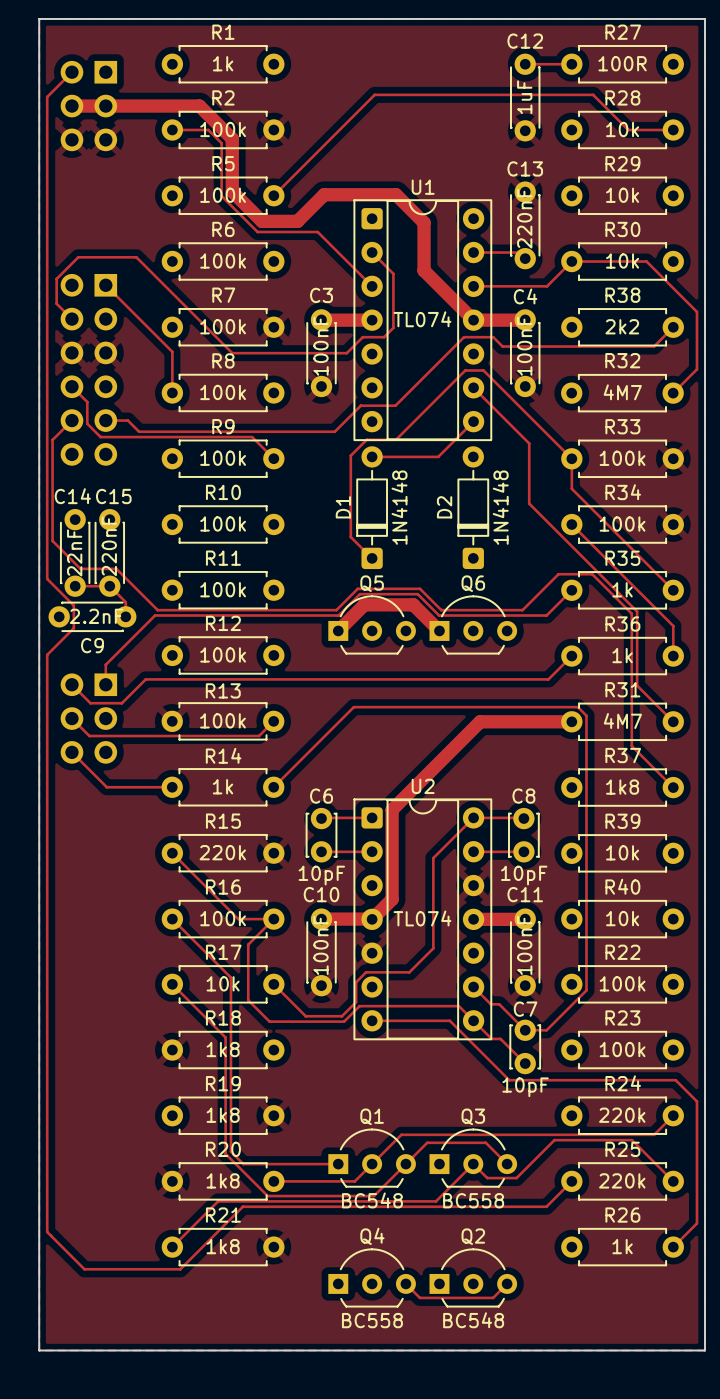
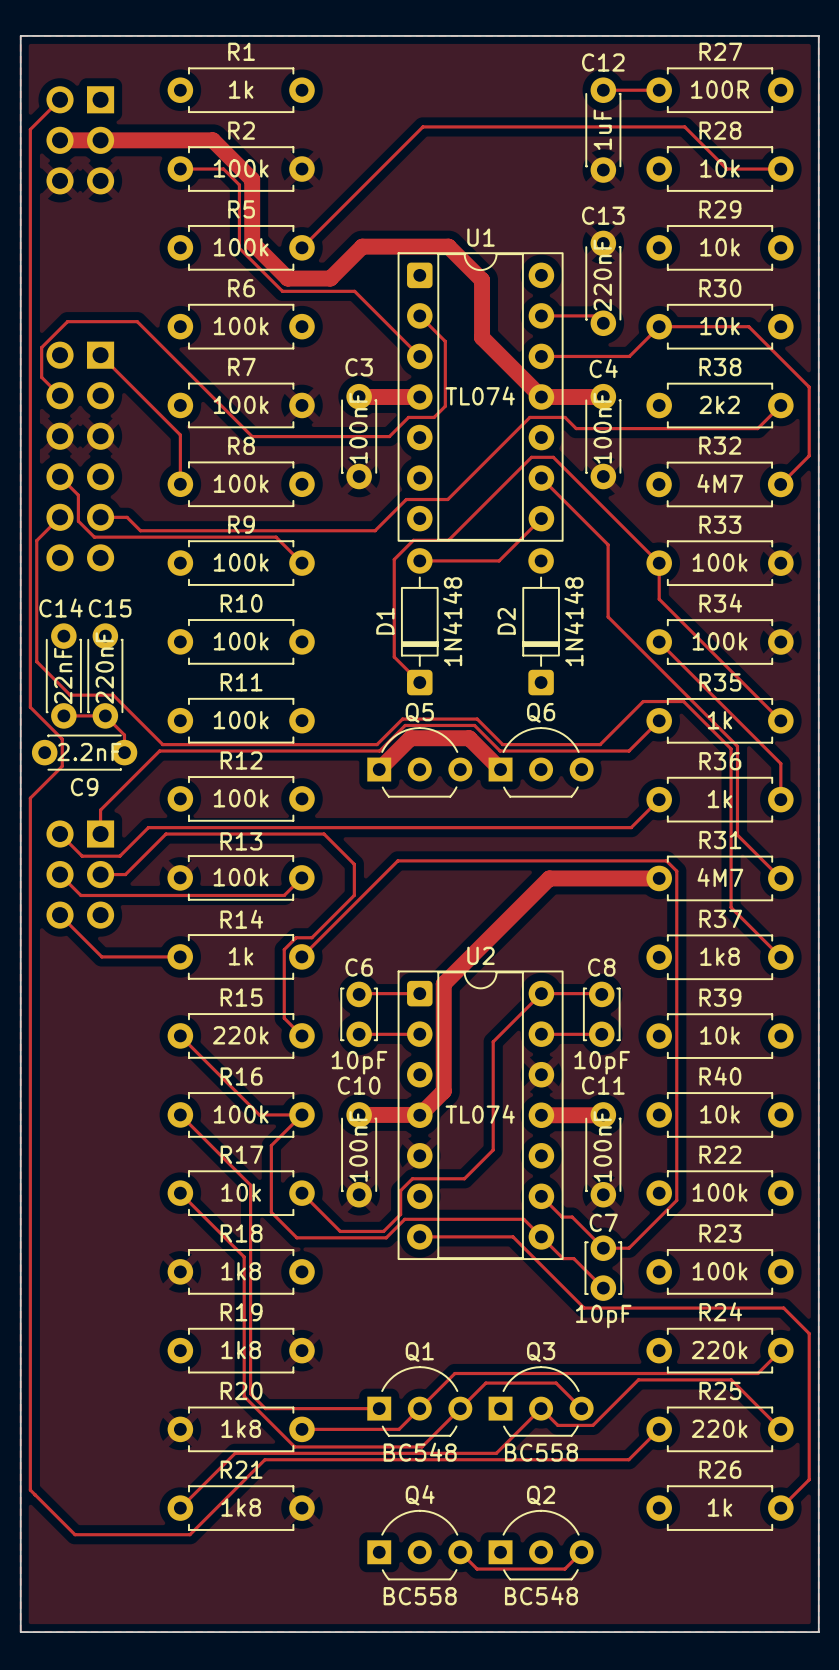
track: none -> (100, 874) (125, 874) (166, 834) (324, 834) (354, 864) (354, 895) (311, 937) (296, 937) (284, 949) (284, 1018) (301, 1035)

